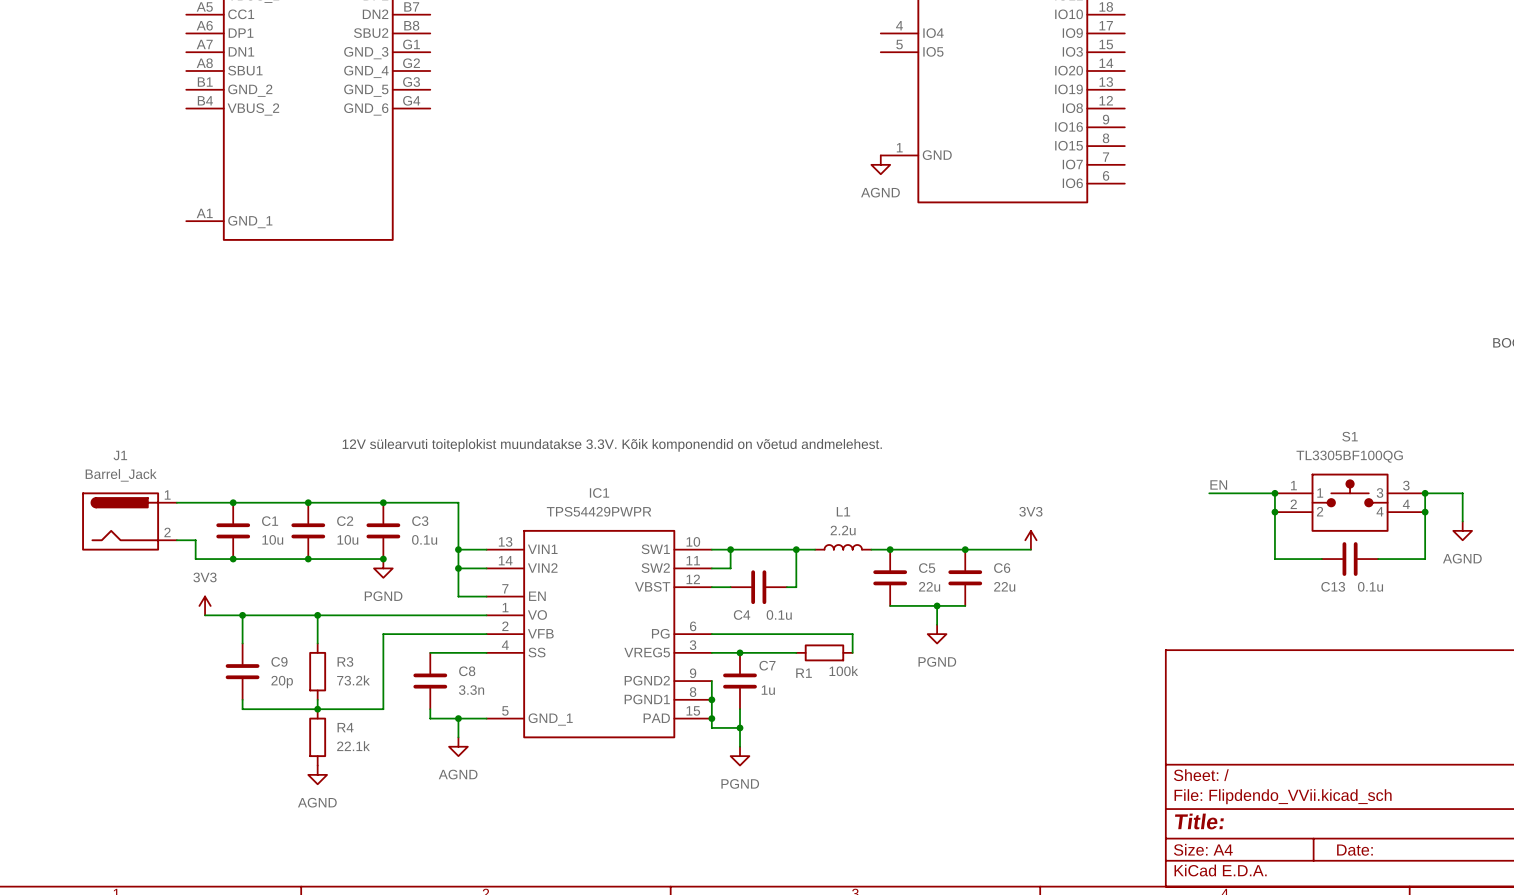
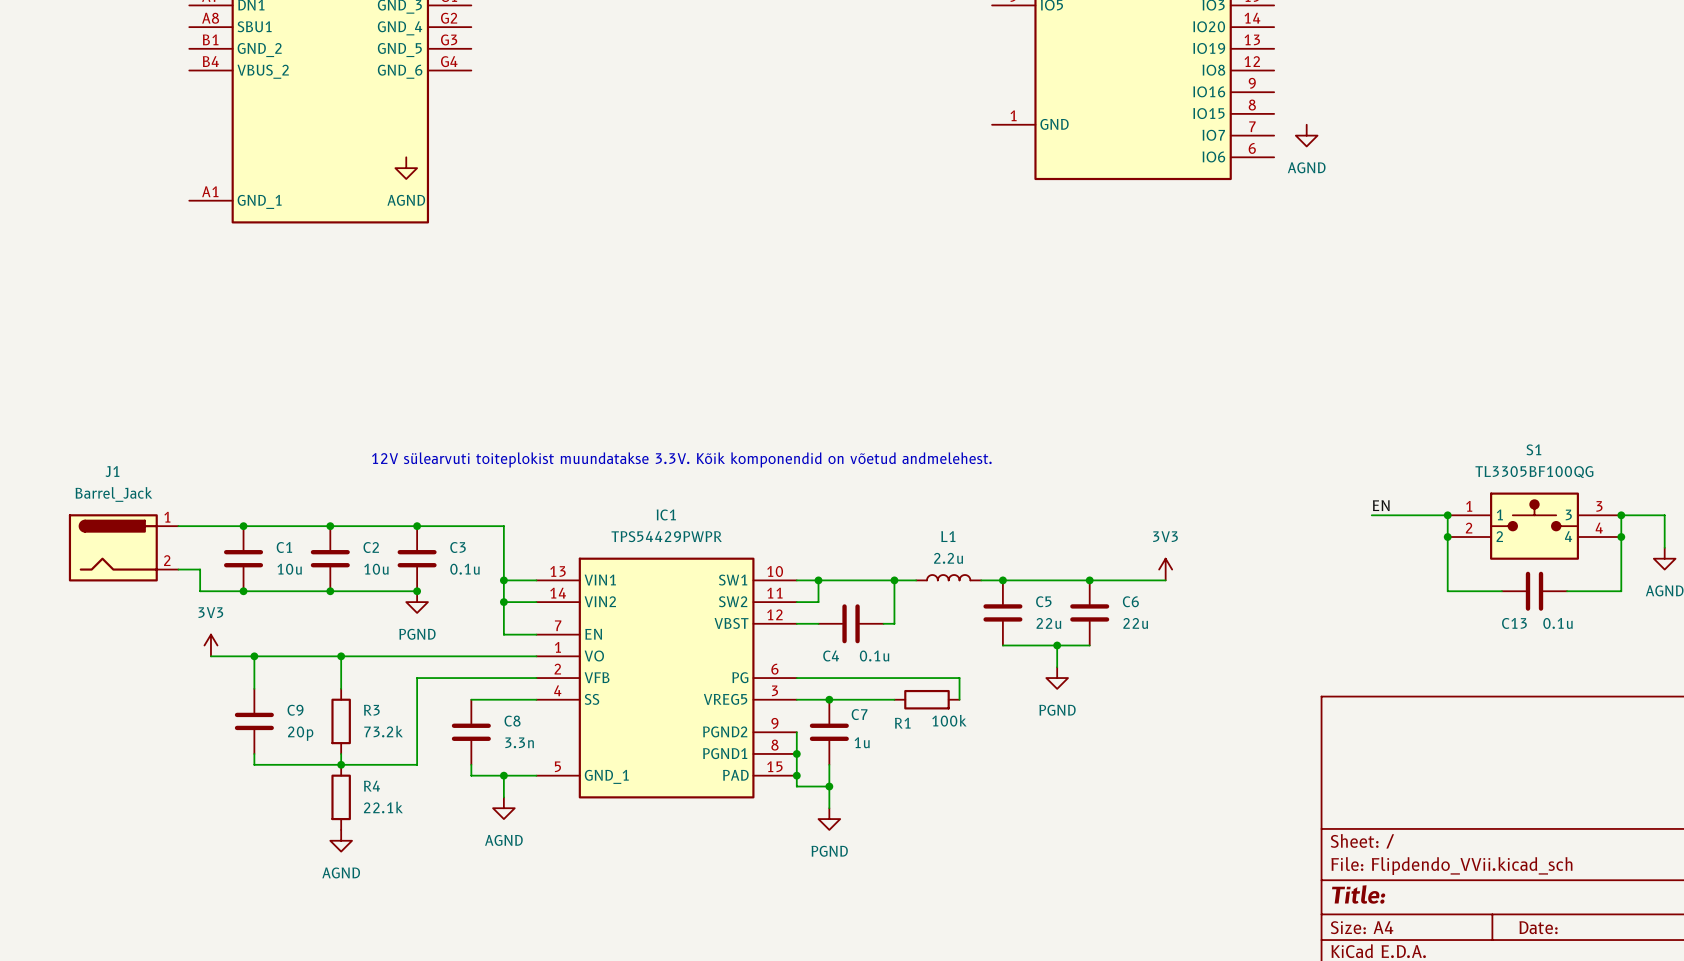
power symbol: AGND (880, 164) -> none
power symbol: none -> AGND (1306, 135)
power symbol: none -> AGND (406, 168)

